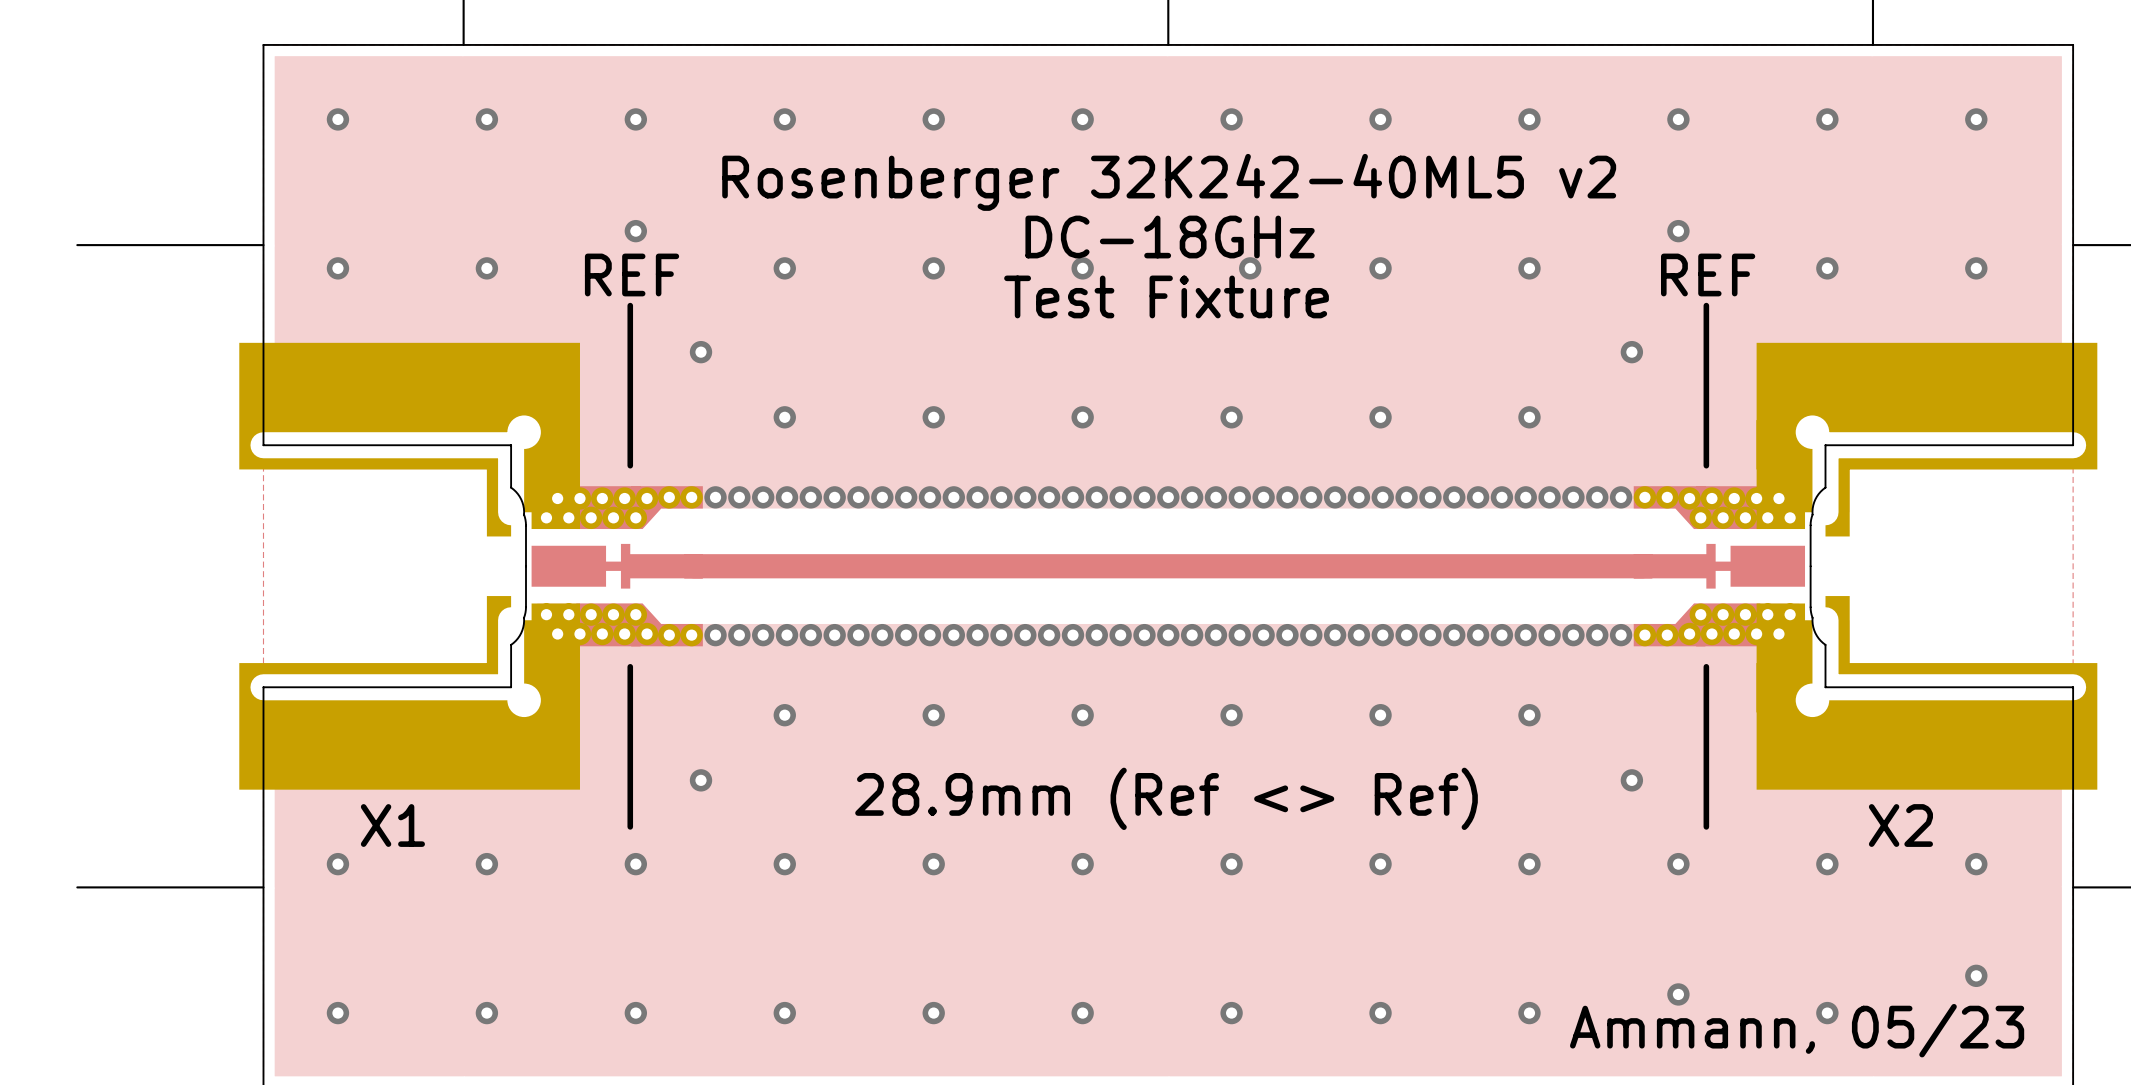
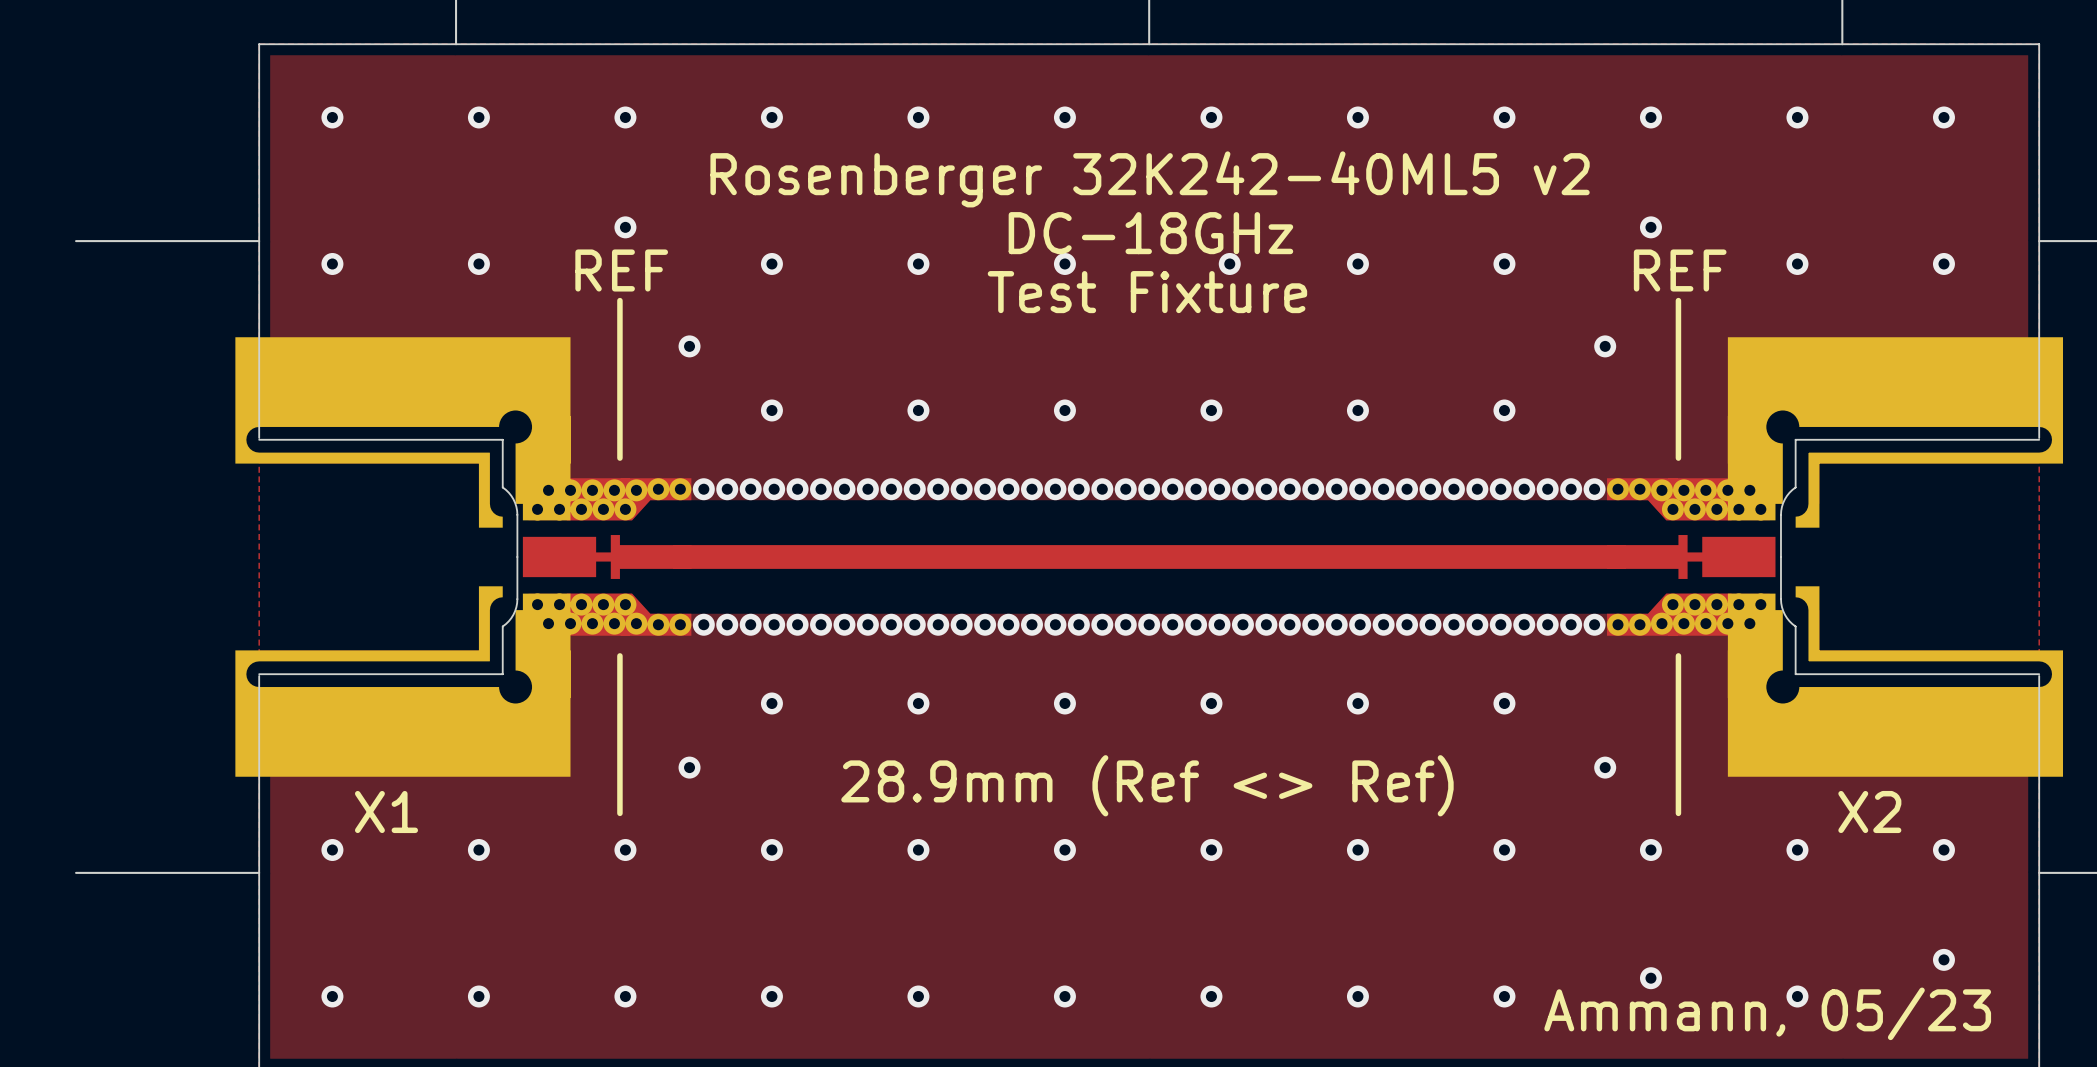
X1 footprint: [239, 342, 703, 790] -> [235, 337, 692, 777]
X2 footprint: [1633, 342, 2098, 790] -> [1607, 337, 2064, 777]

